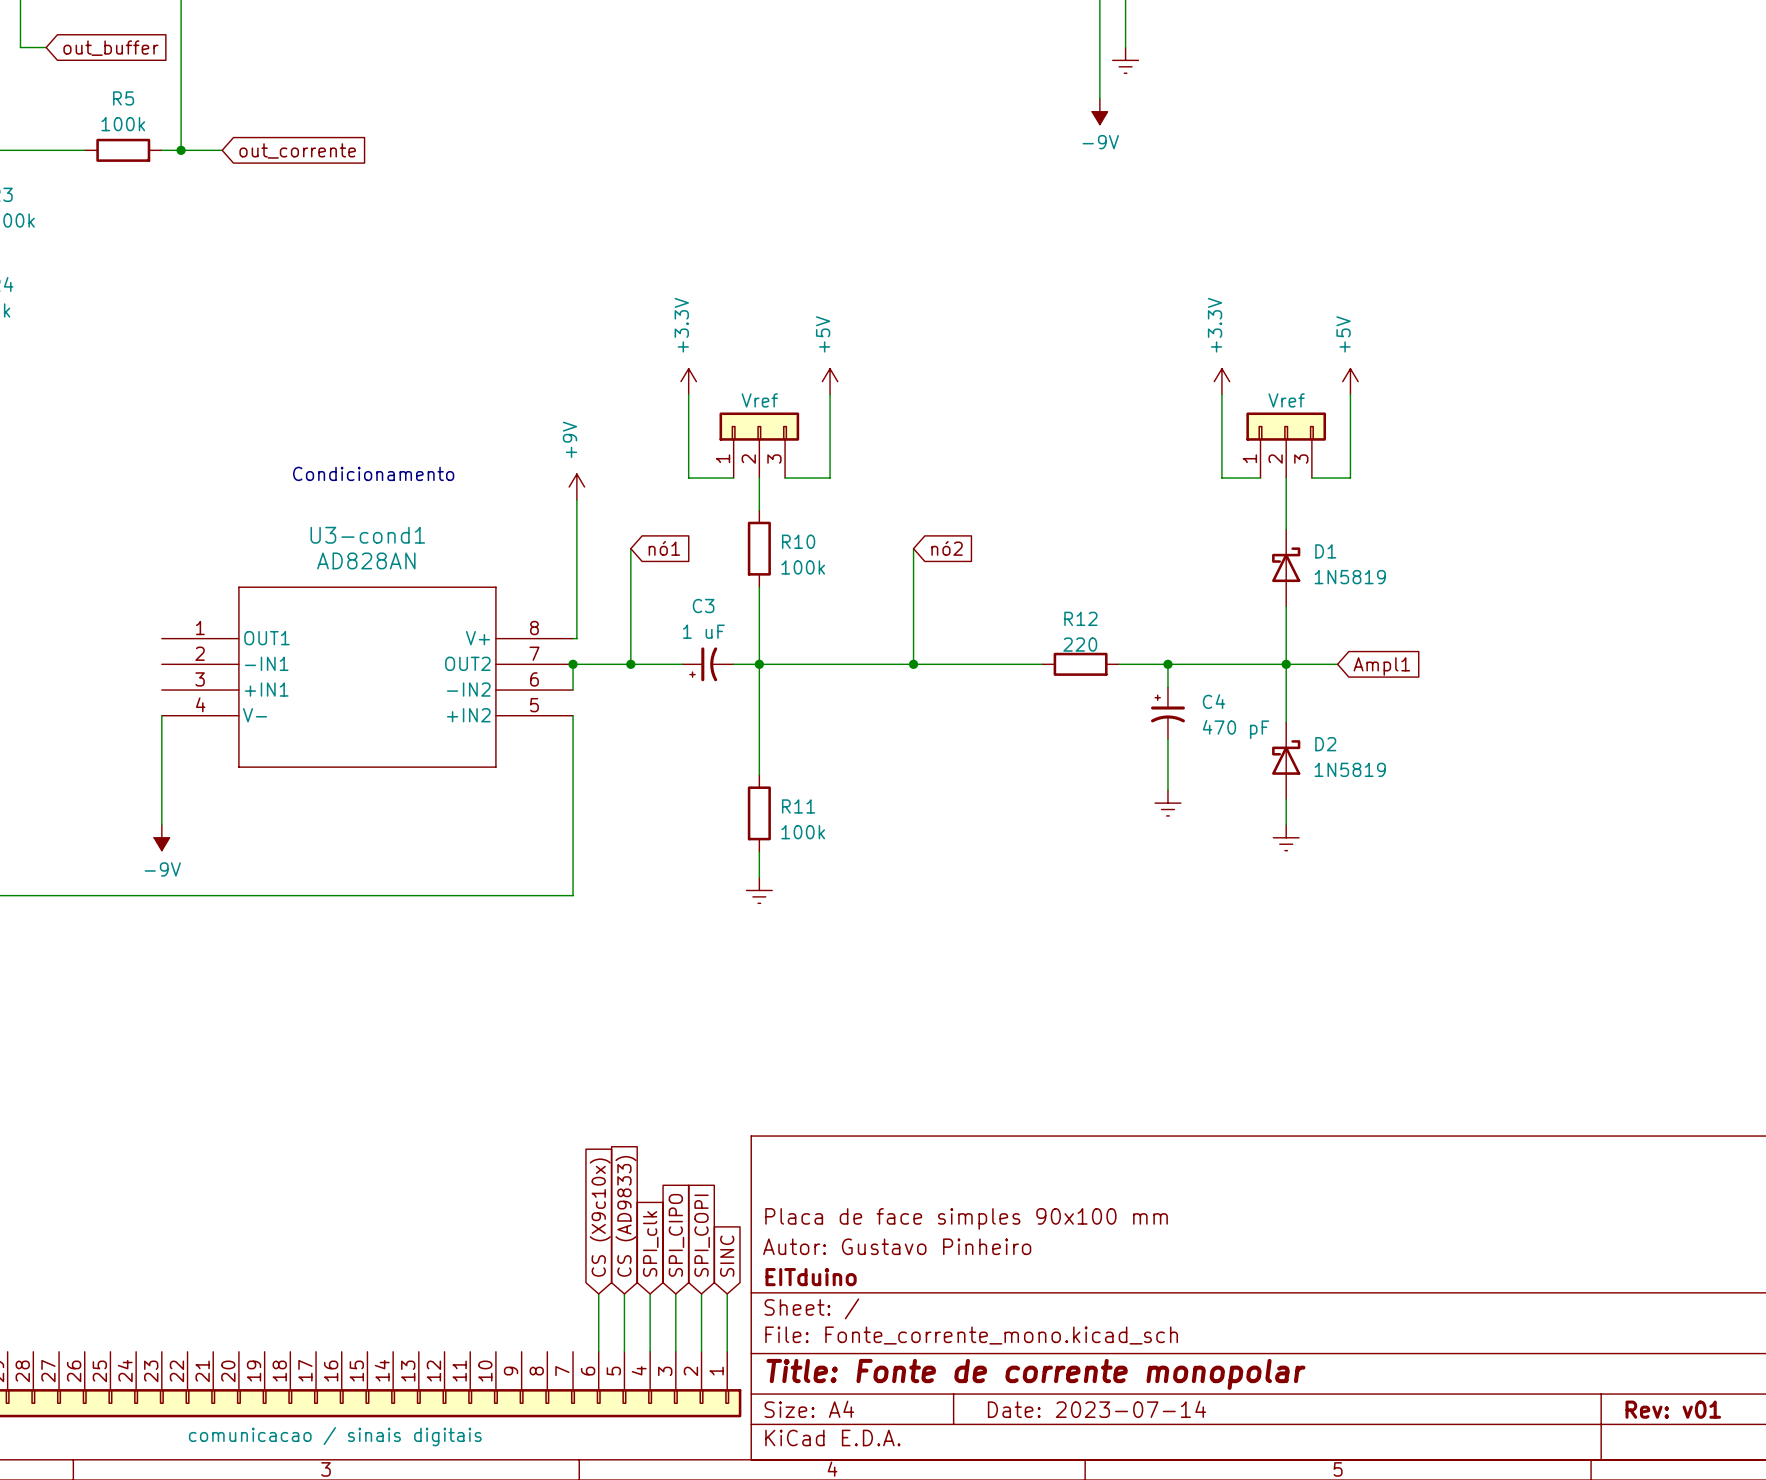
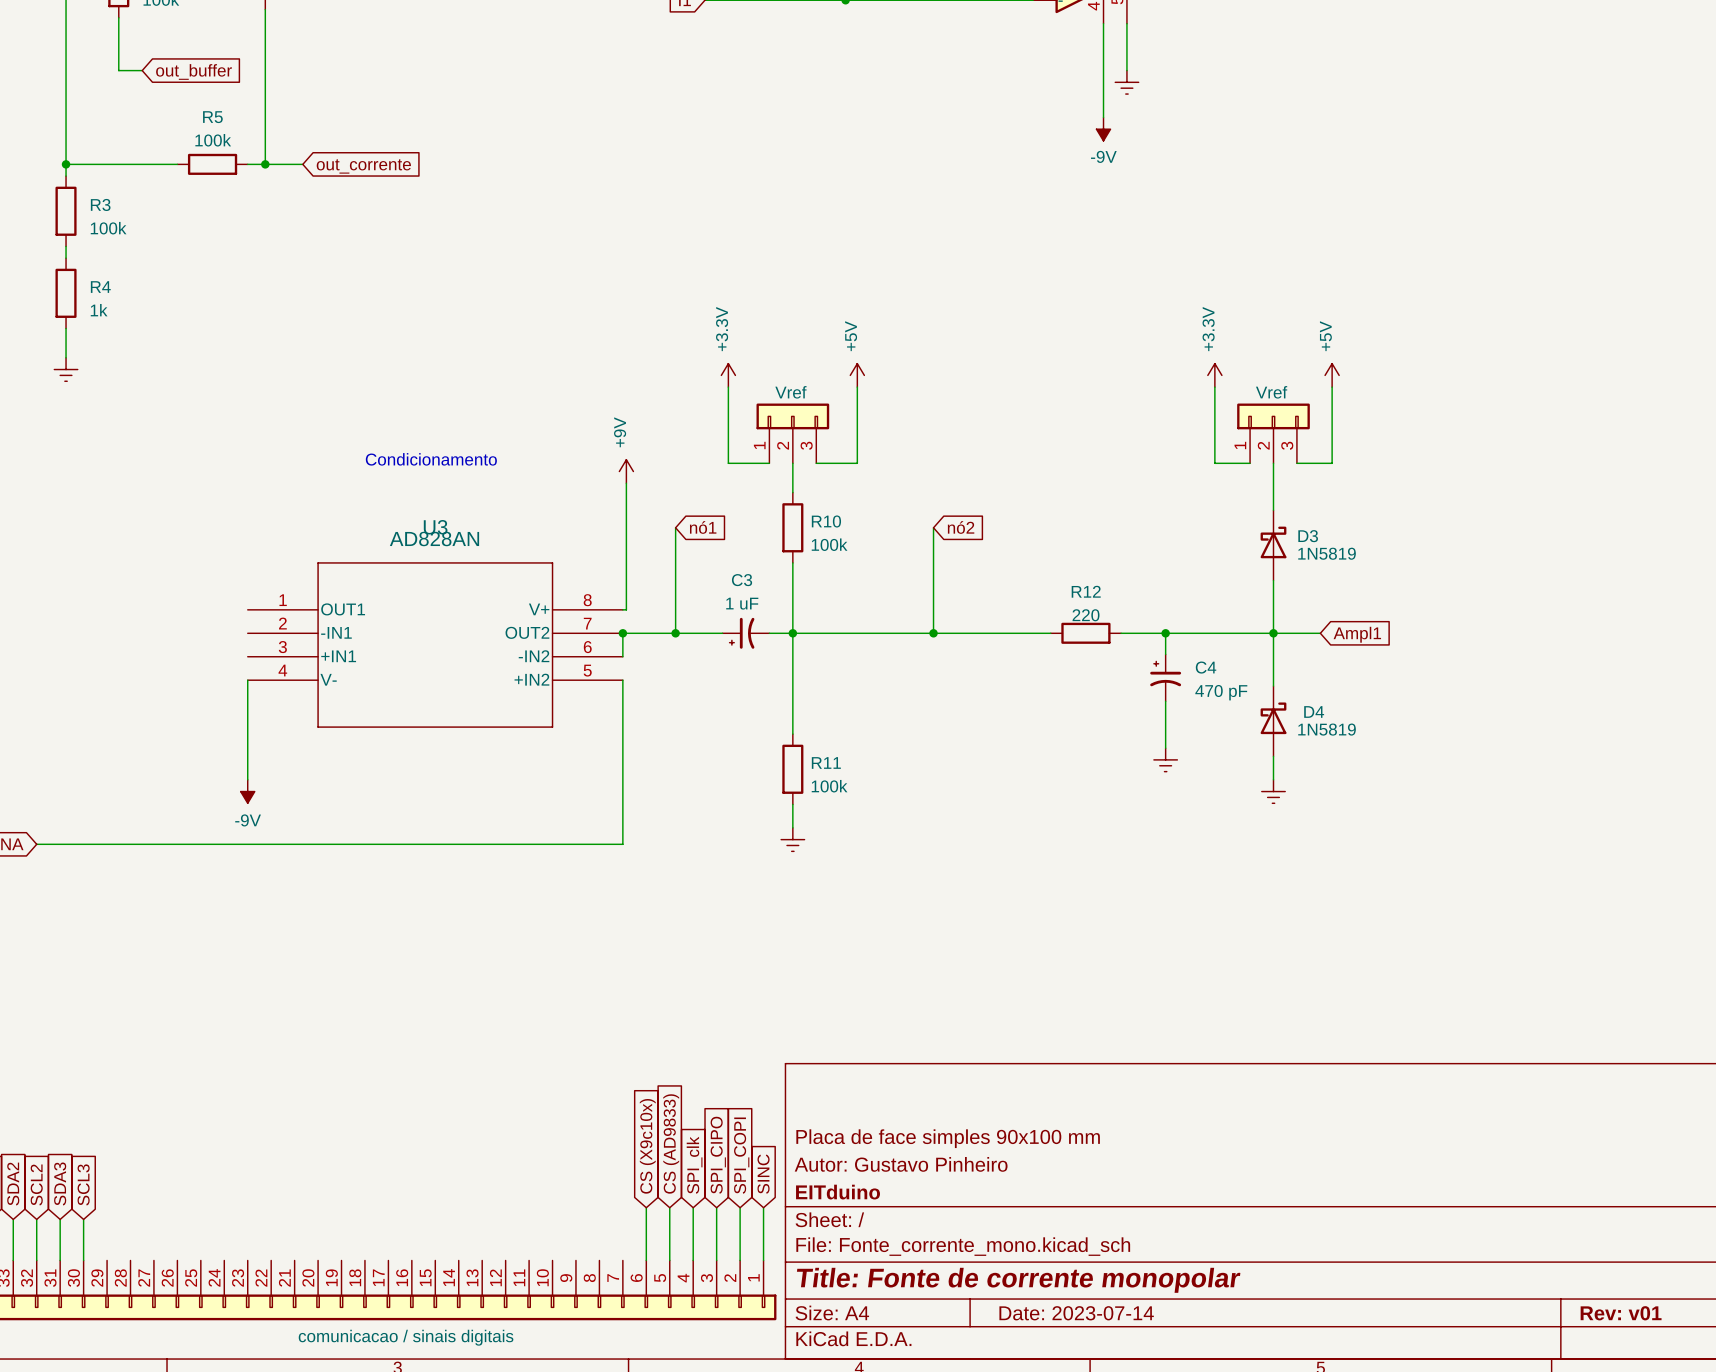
U3-cond1 name: U3-cond1 (367, 535) -> U3 (435, 527)
D1 name: D1 (1325, 551) -> D3 (1308, 536)
D2 name: D2 (1325, 744) -> D4 (1314, 711)

